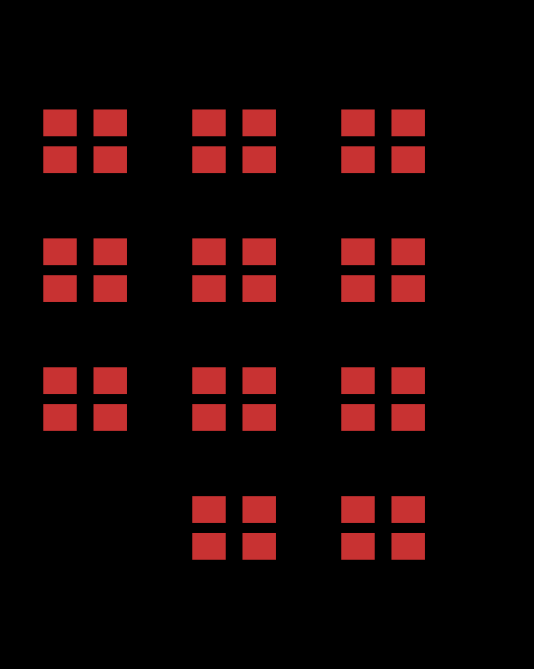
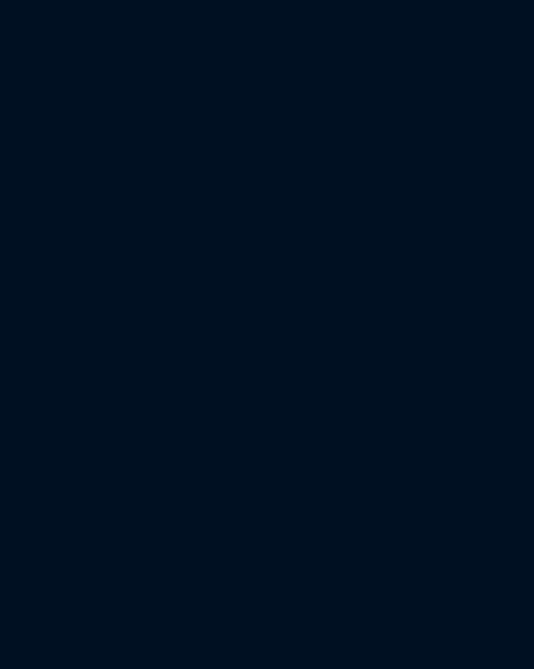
part: (85, 141) -> none
part: (234, 141) -> none
part: (383, 141) -> none
part: (85, 270) -> none
part: (234, 270) -> none
part: (383, 270) -> none
part: (85, 399) -> none
part: (234, 399) -> none
part: (383, 399) -> none
part: (234, 527) -> none
part: (383, 527) -> none

